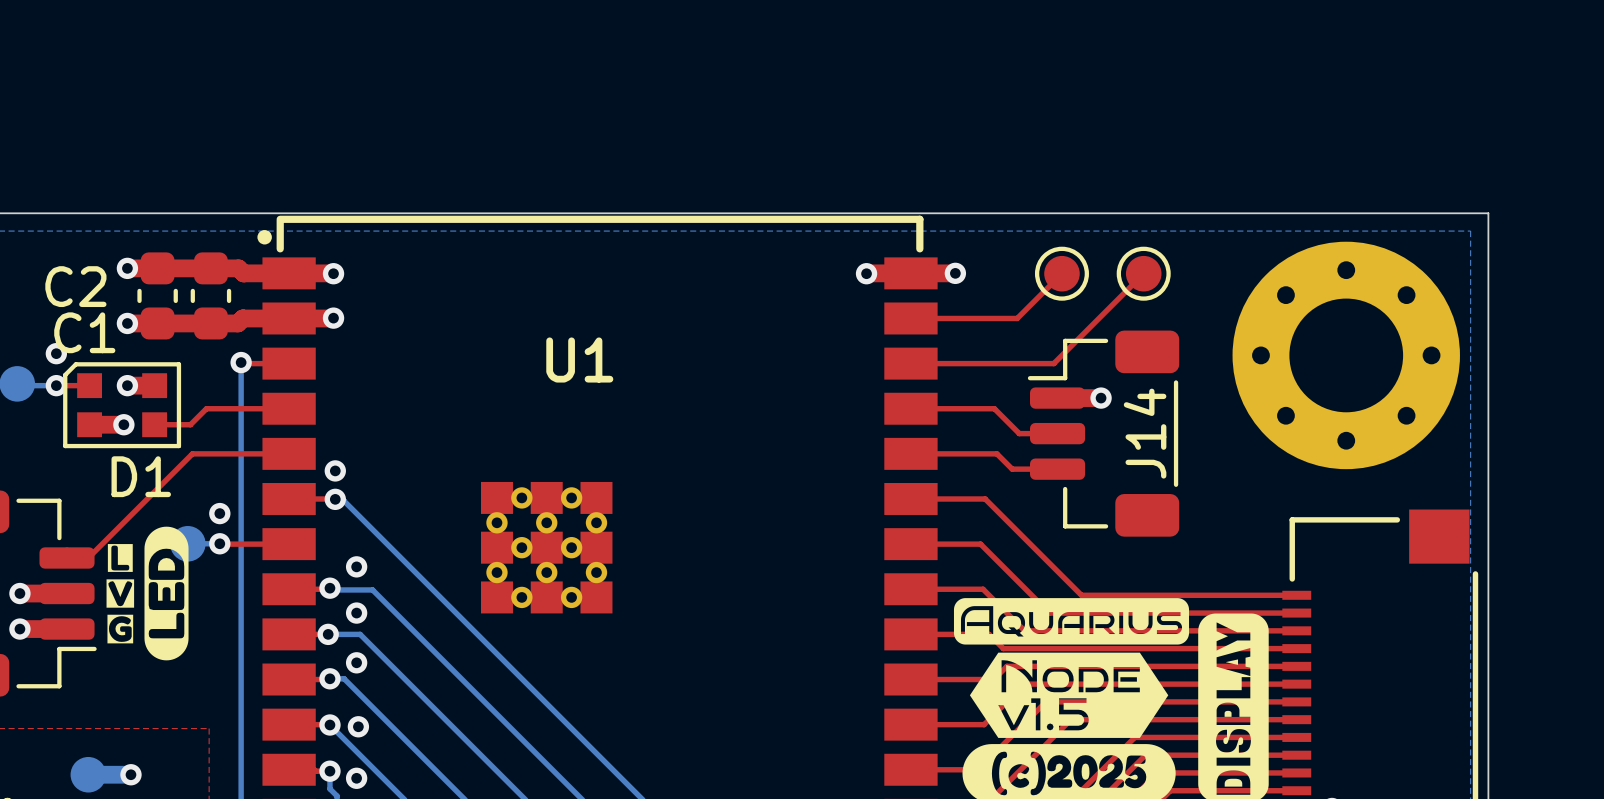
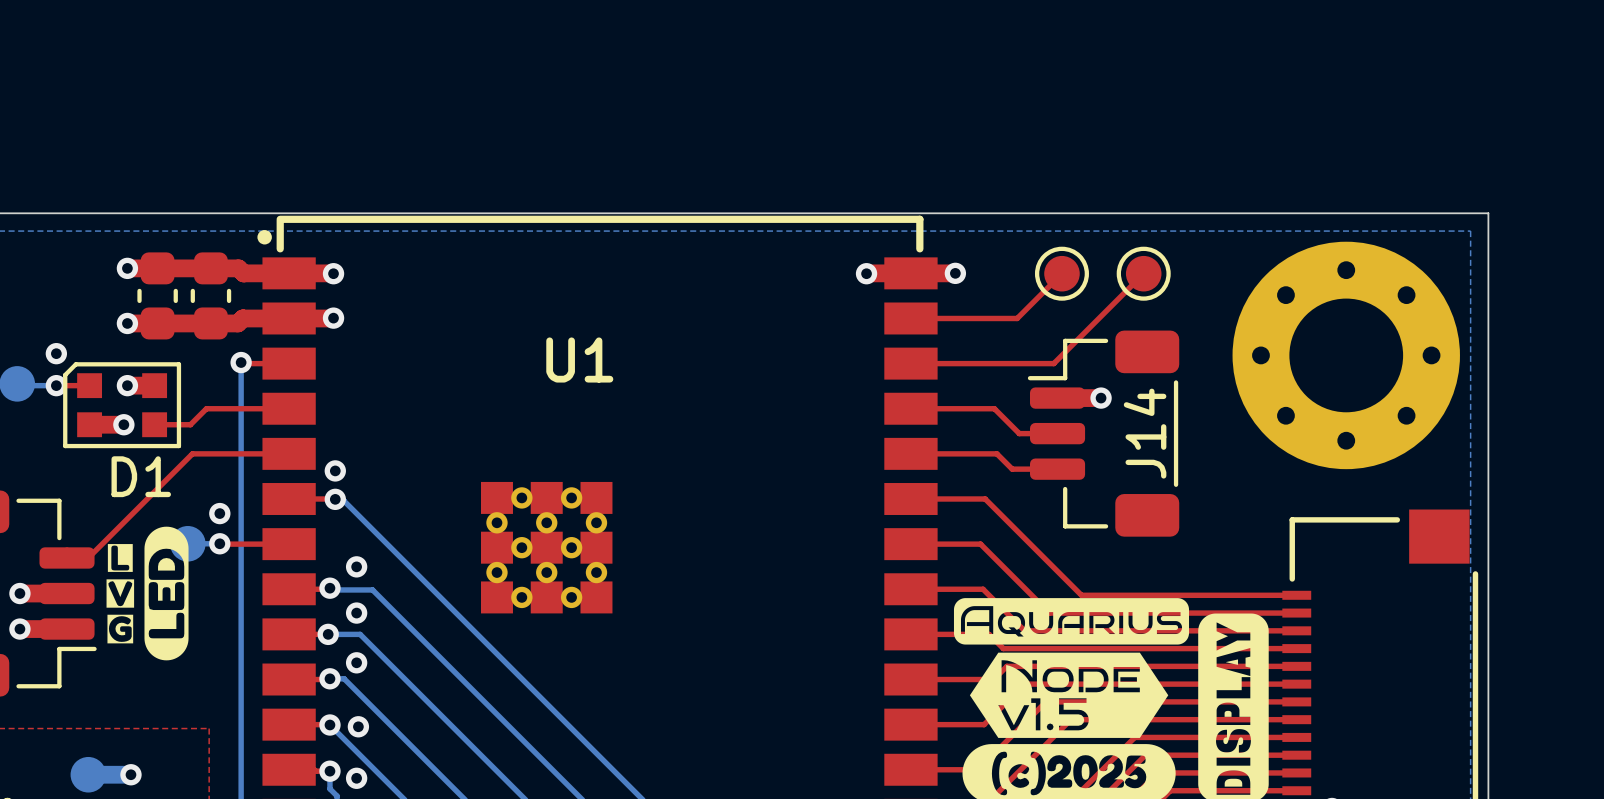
C2 name: C2 (75, 286) -> none
C1 name: C1 (84, 332) -> none

